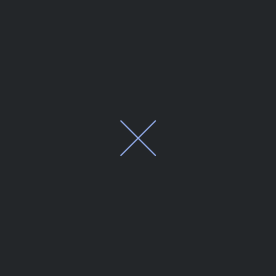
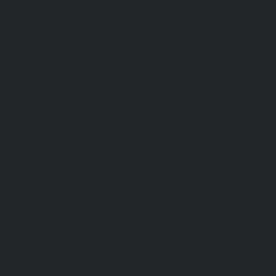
no-connect mark: (138, 138) -> none

